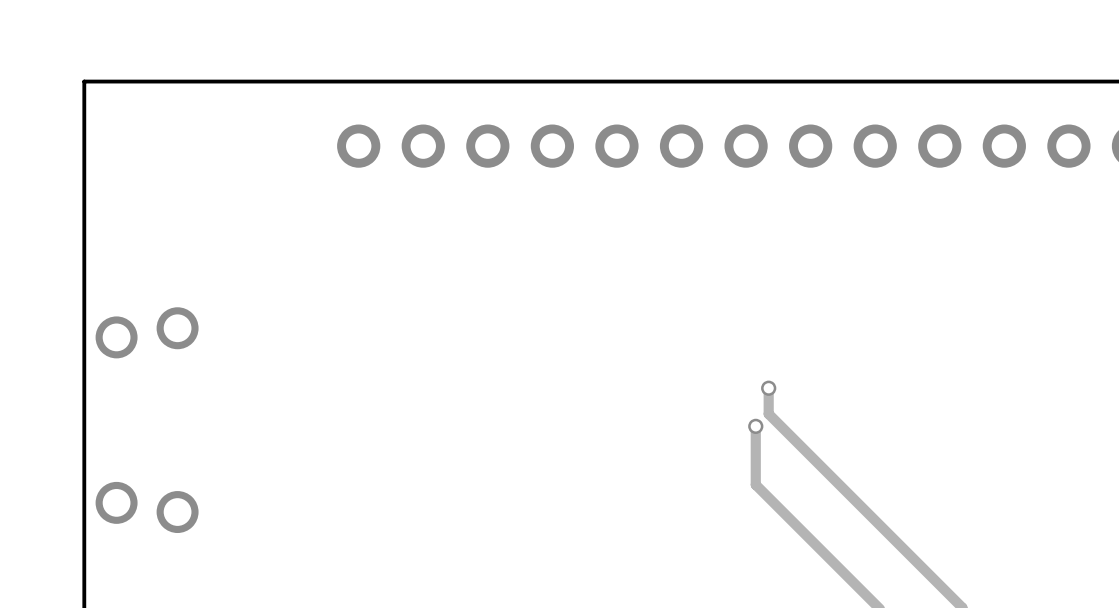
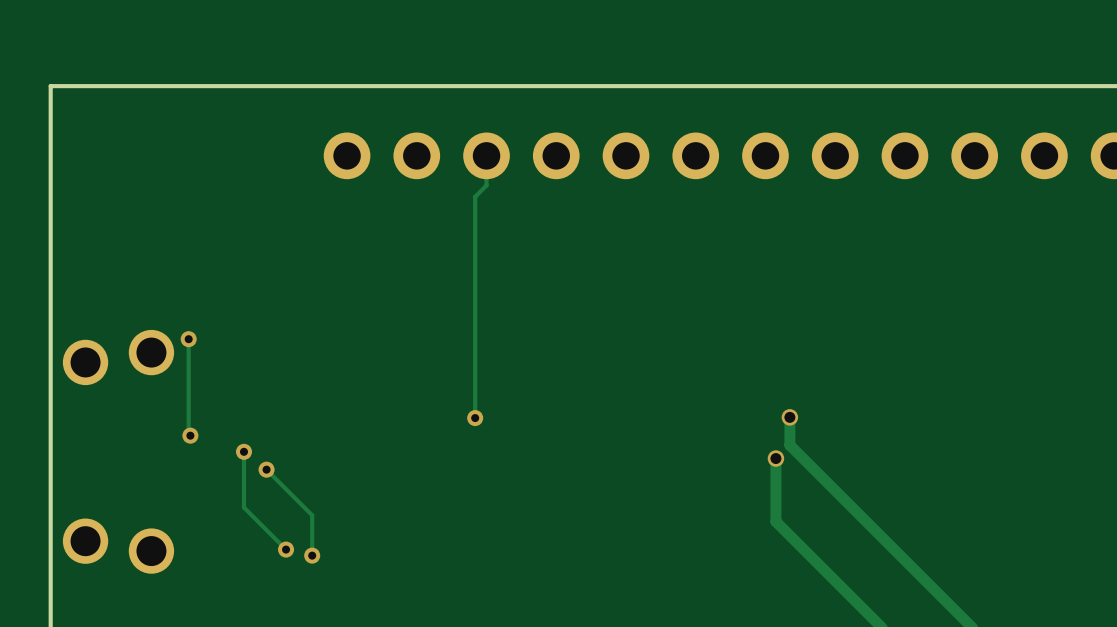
track: none -> (486, 155) (486, 185) (475, 196) (475, 418)
track: none -> (188, 339) (188, 433) (190, 435)
via: none -> (188, 339)
via: none -> (475, 418)
via: none -> (190, 435)
track: none -> (243, 451) (243, 507) (286, 549)
via: none -> (243, 451)
track: none -> (266, 469) (312, 515) (312, 555)
via: none -> (266, 469)
via: none -> (286, 549)
via: none -> (312, 555)

